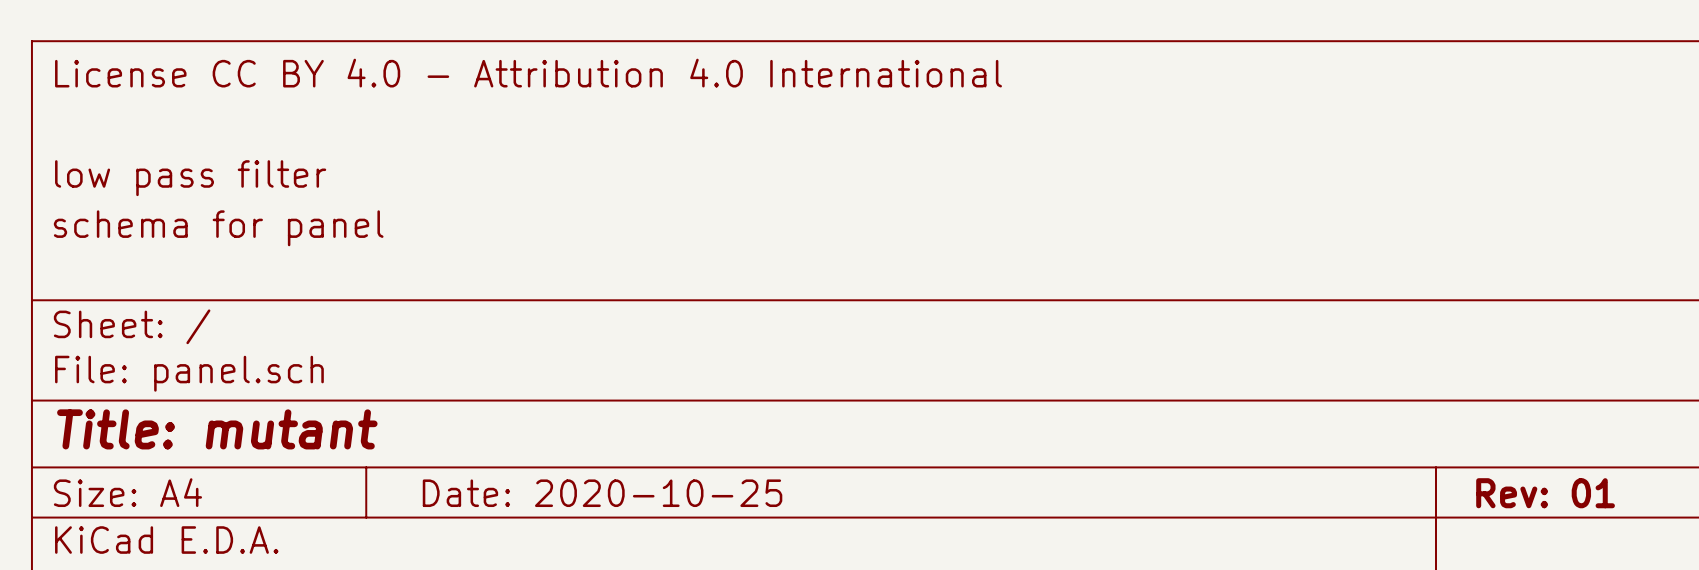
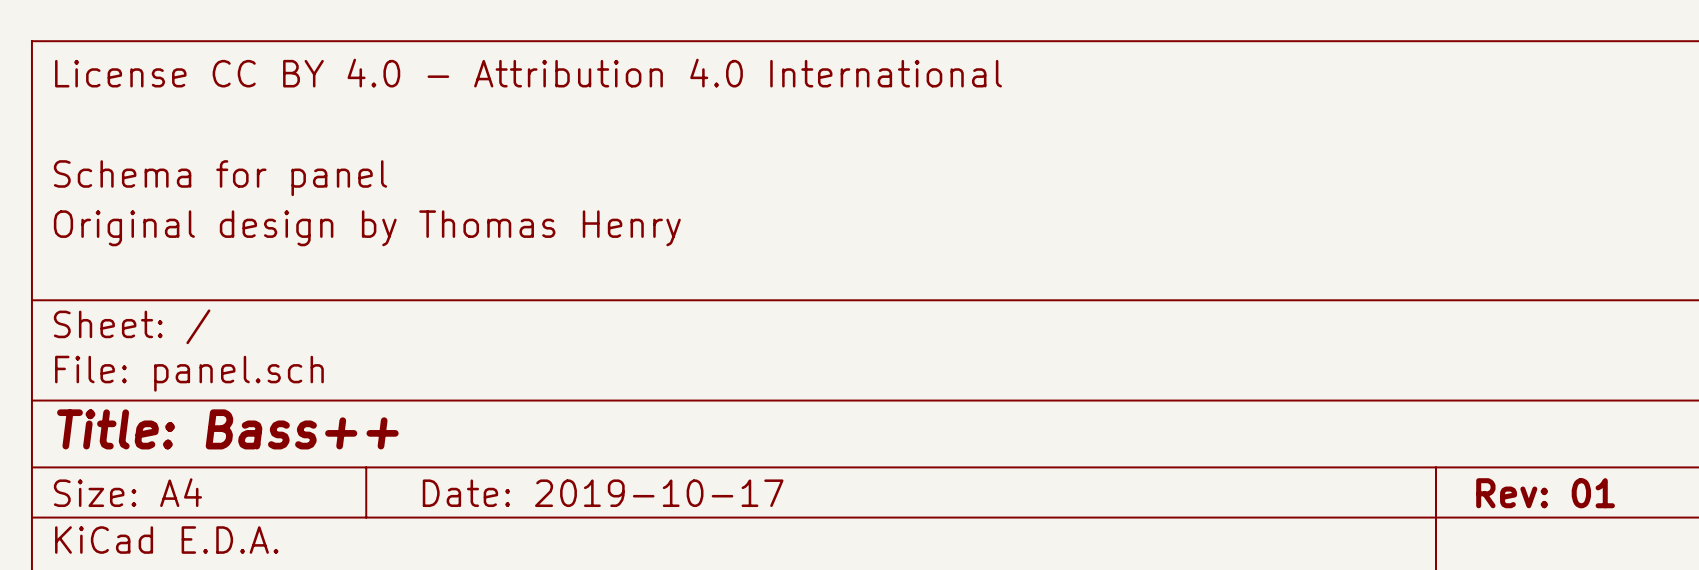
title block: low pass filter (190, 178) -> Schema for panel (220, 178)
title block: schema for panel (218, 228) -> Original design by Thomas Henry (367, 228)
title block: Title: mutant (217, 429) -> Title: Bass++ (227, 429)
title block: Date: 2020-10-25 (602, 493) -> Date: 2019-10-17 (603, 493)

